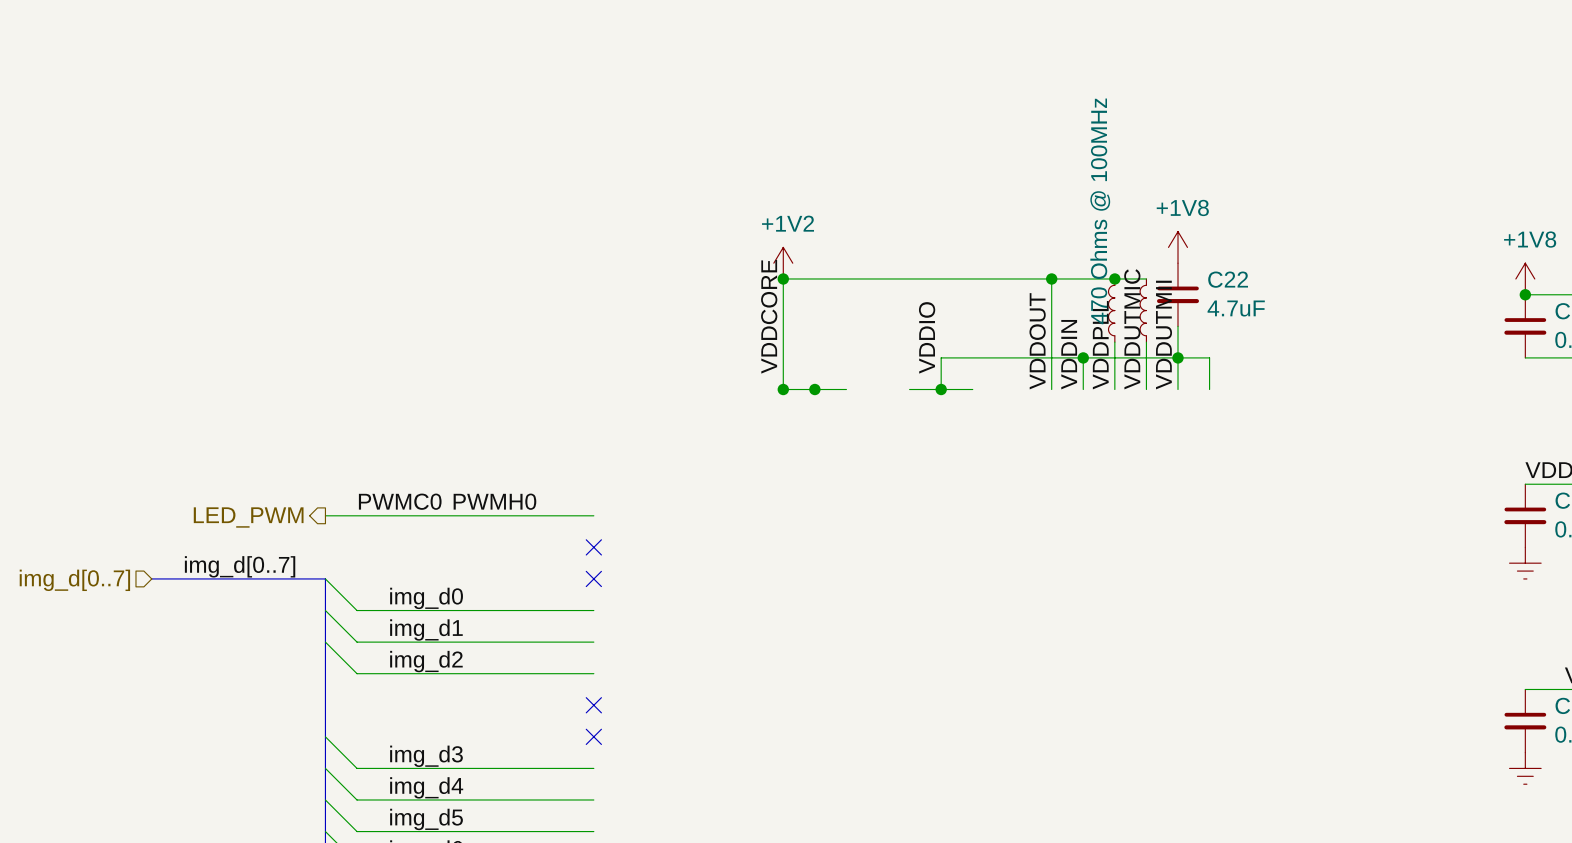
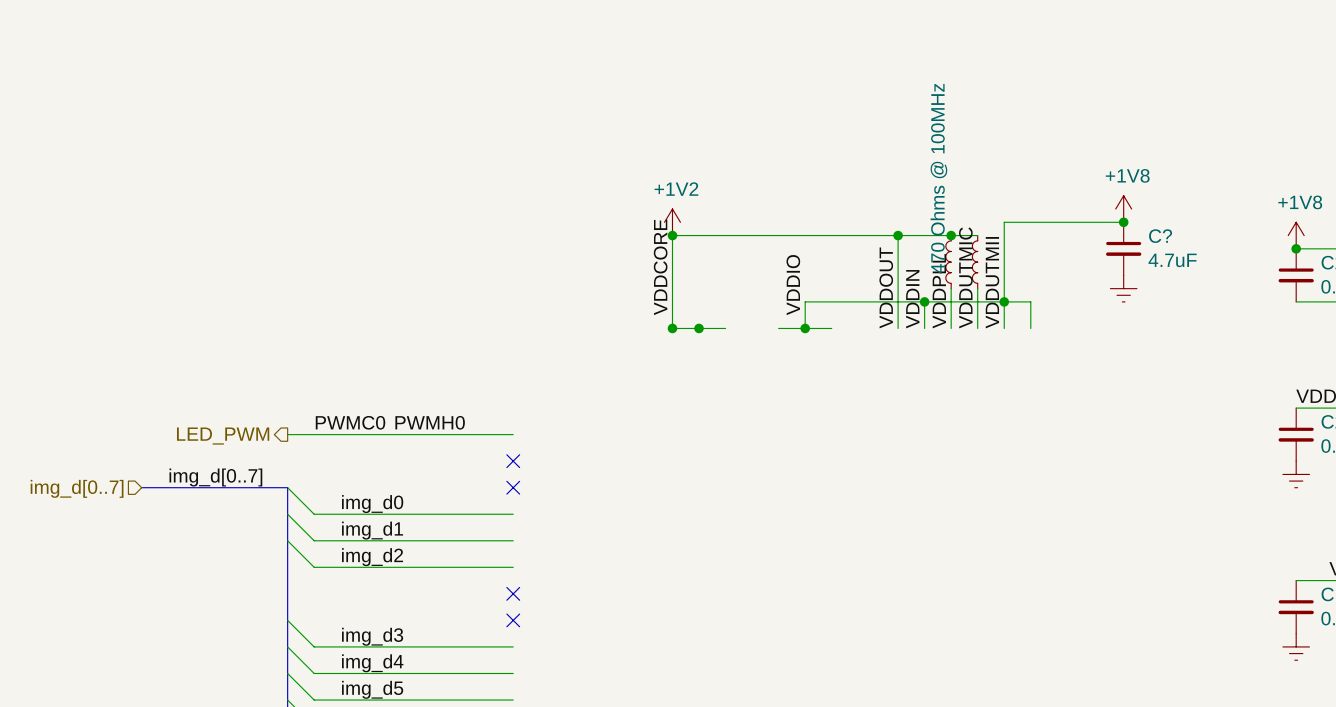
power symbol position: +1V8 (1178, 247) -> +1V8 (1123, 209)
wire: none -> (1123, 222) (1004, 222) (1004, 275)
junction: none -> (1123, 222)
C22: (1178, 294) -> none
C?: none -> (1123, 248)
power symbol: none -> (1123, 288)

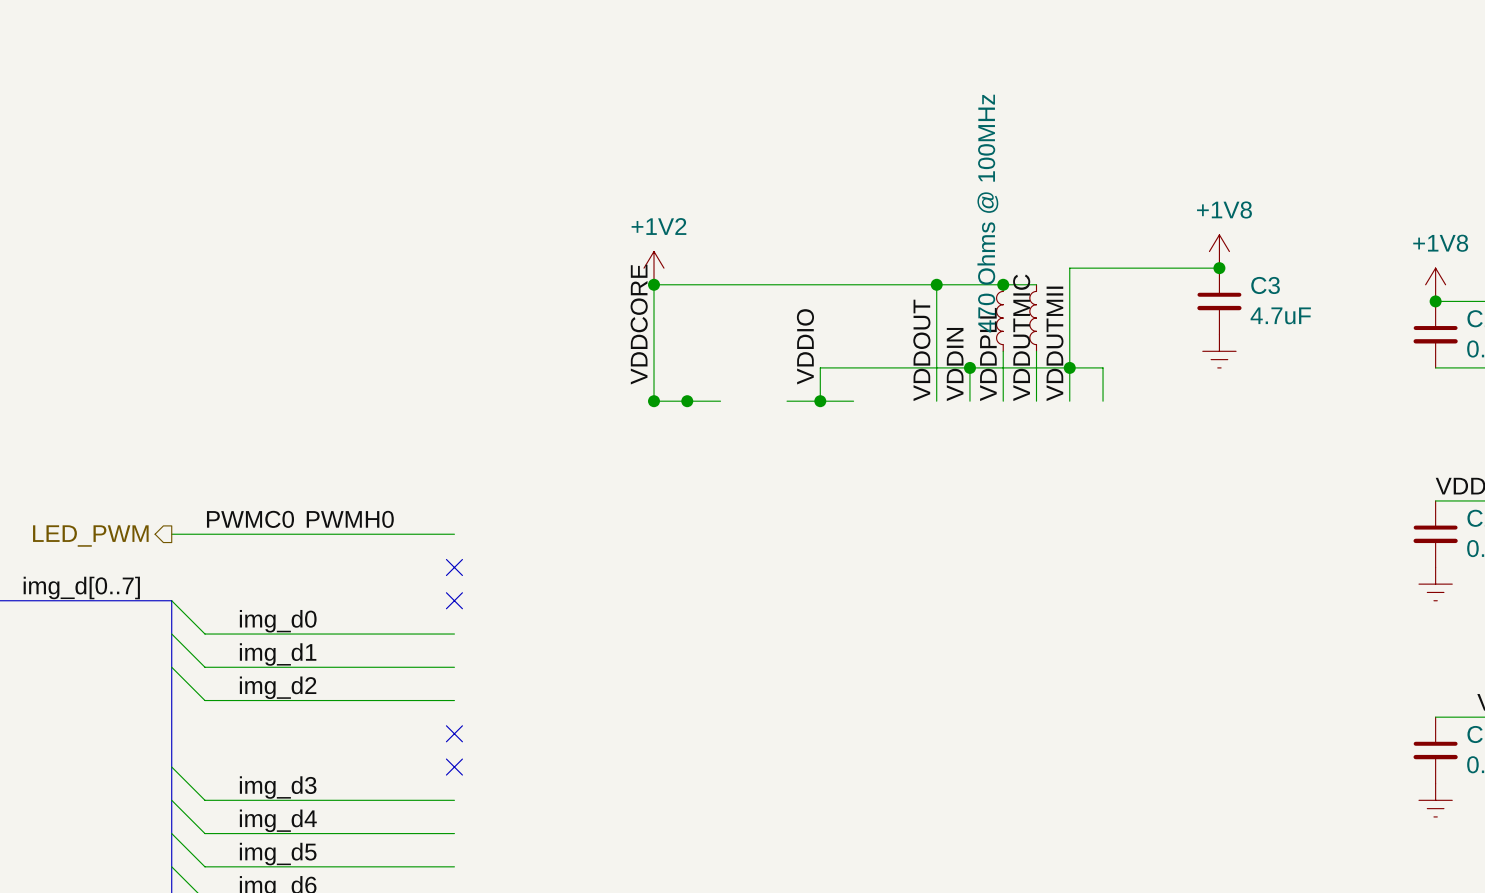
C? name: C? (1160, 236) -> C3 (1265, 285)

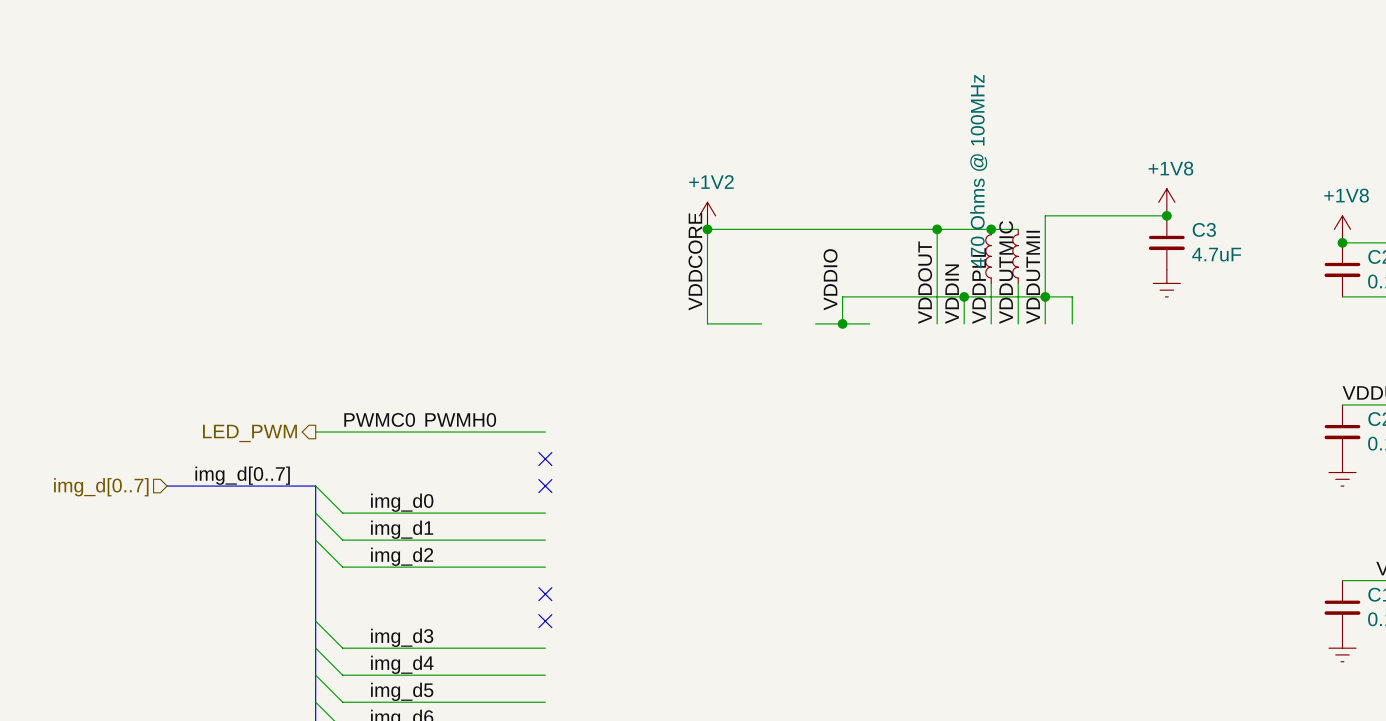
junction: (654, 401) -> none
junction: (687, 401) -> none

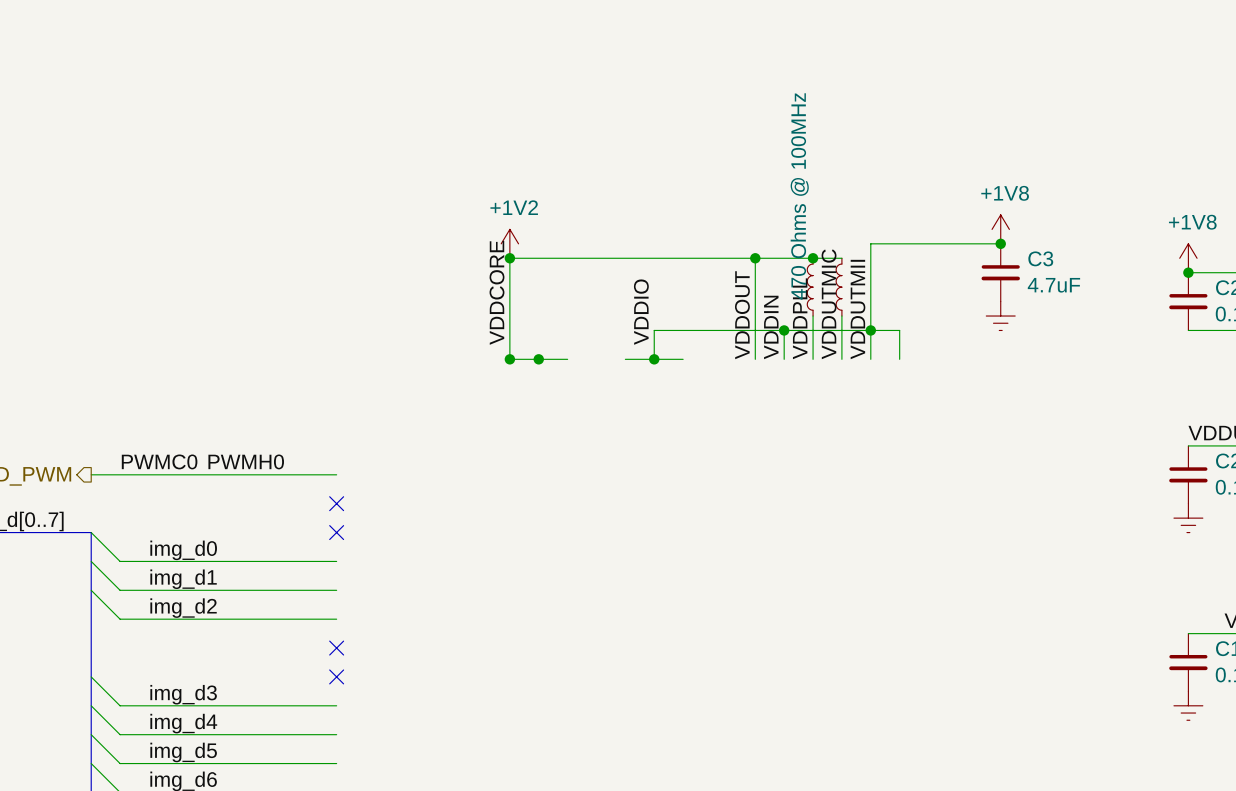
junction: none -> (509, 359)
junction: none -> (538, 359)

